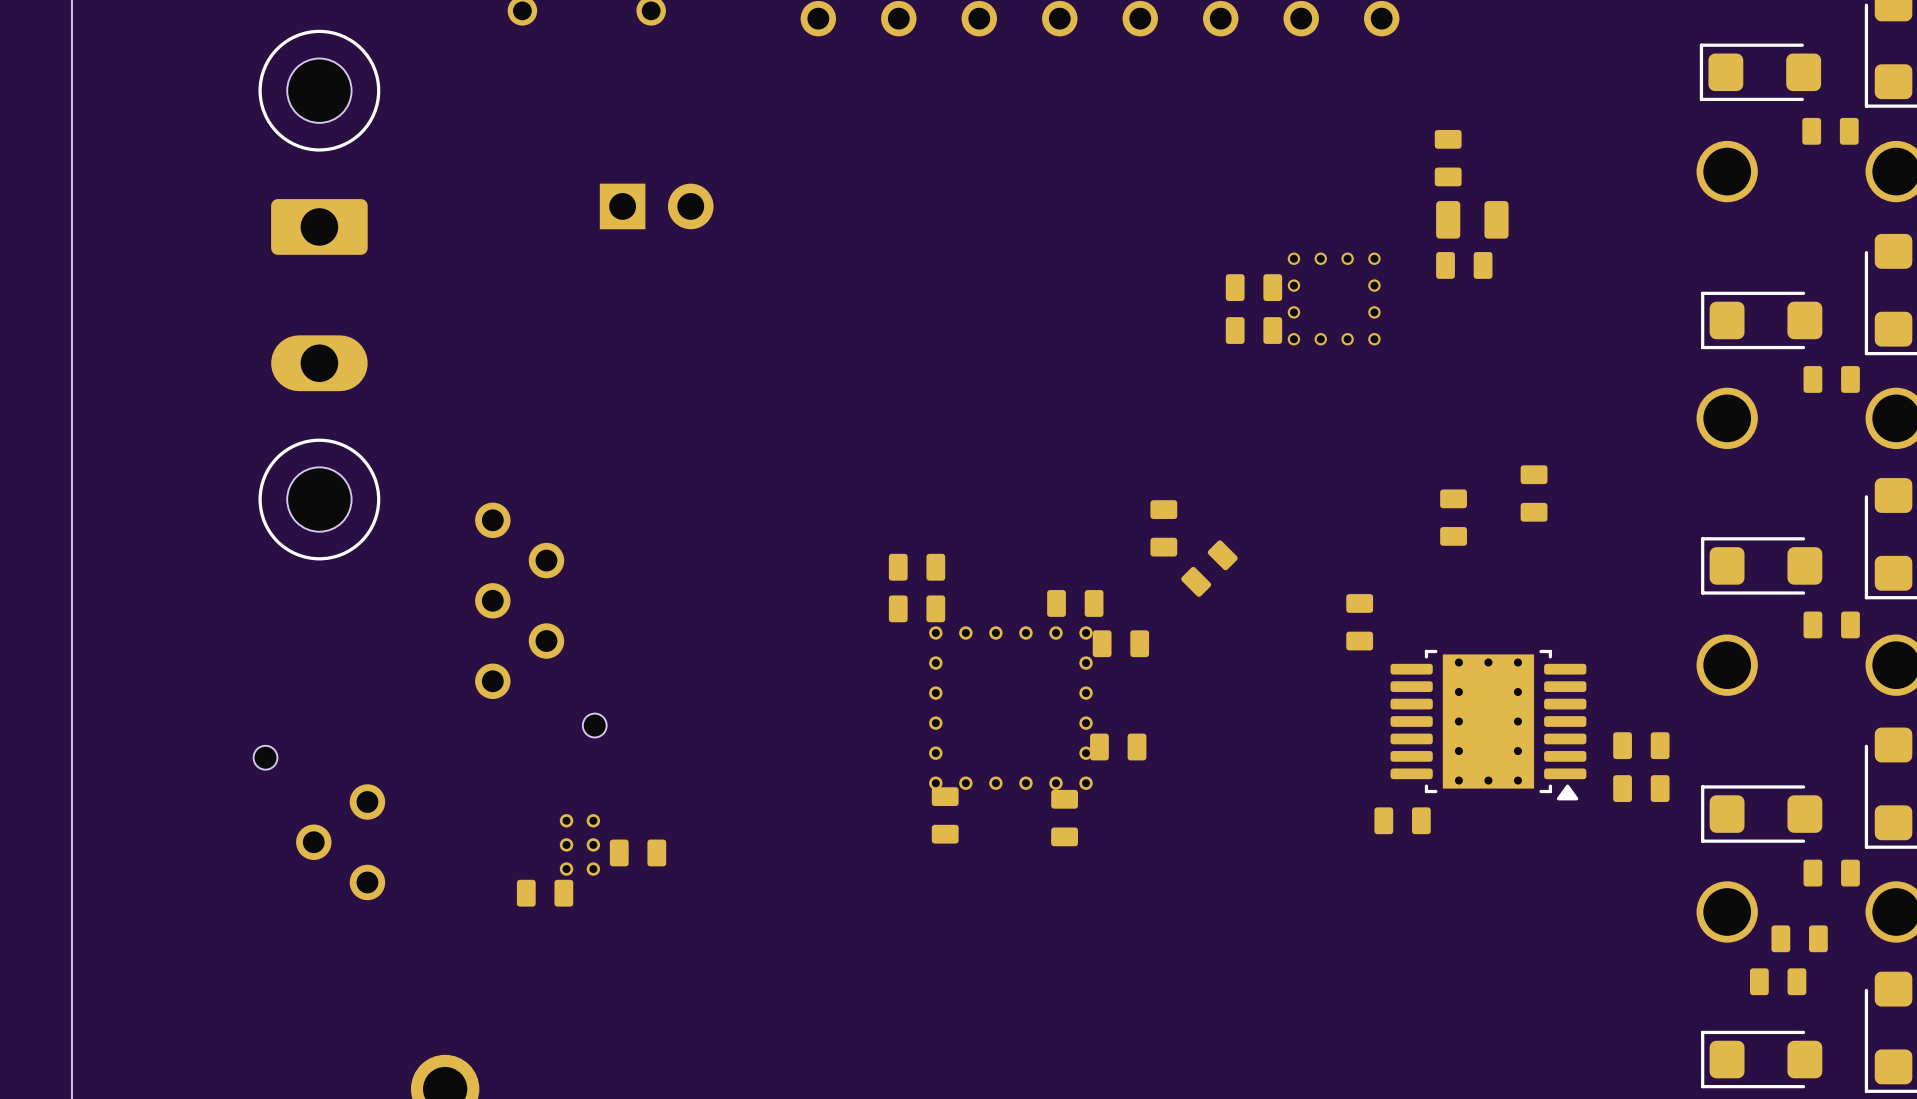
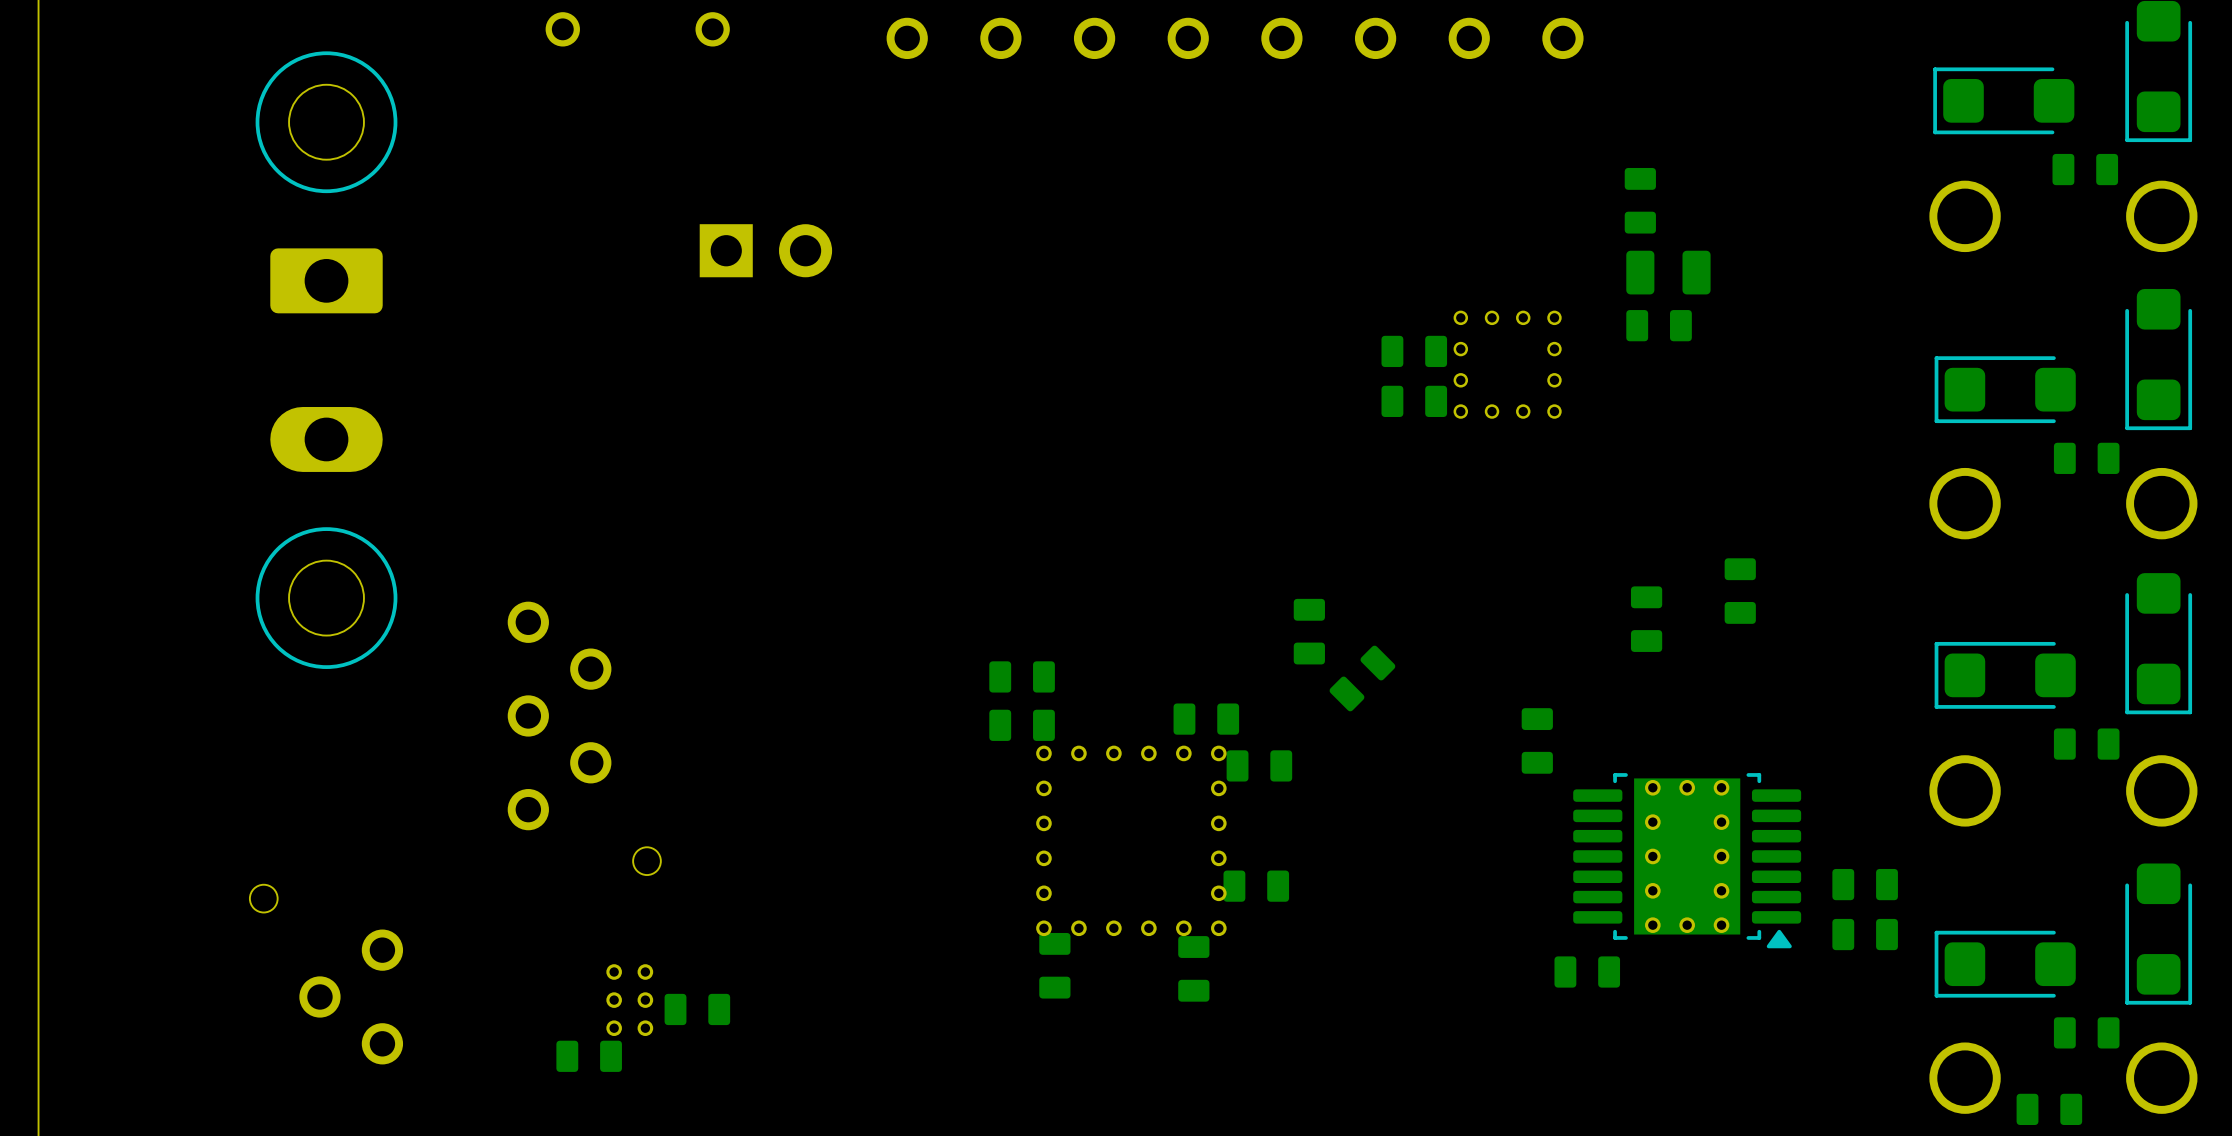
part position: (656, 206) -> (765, 250)

